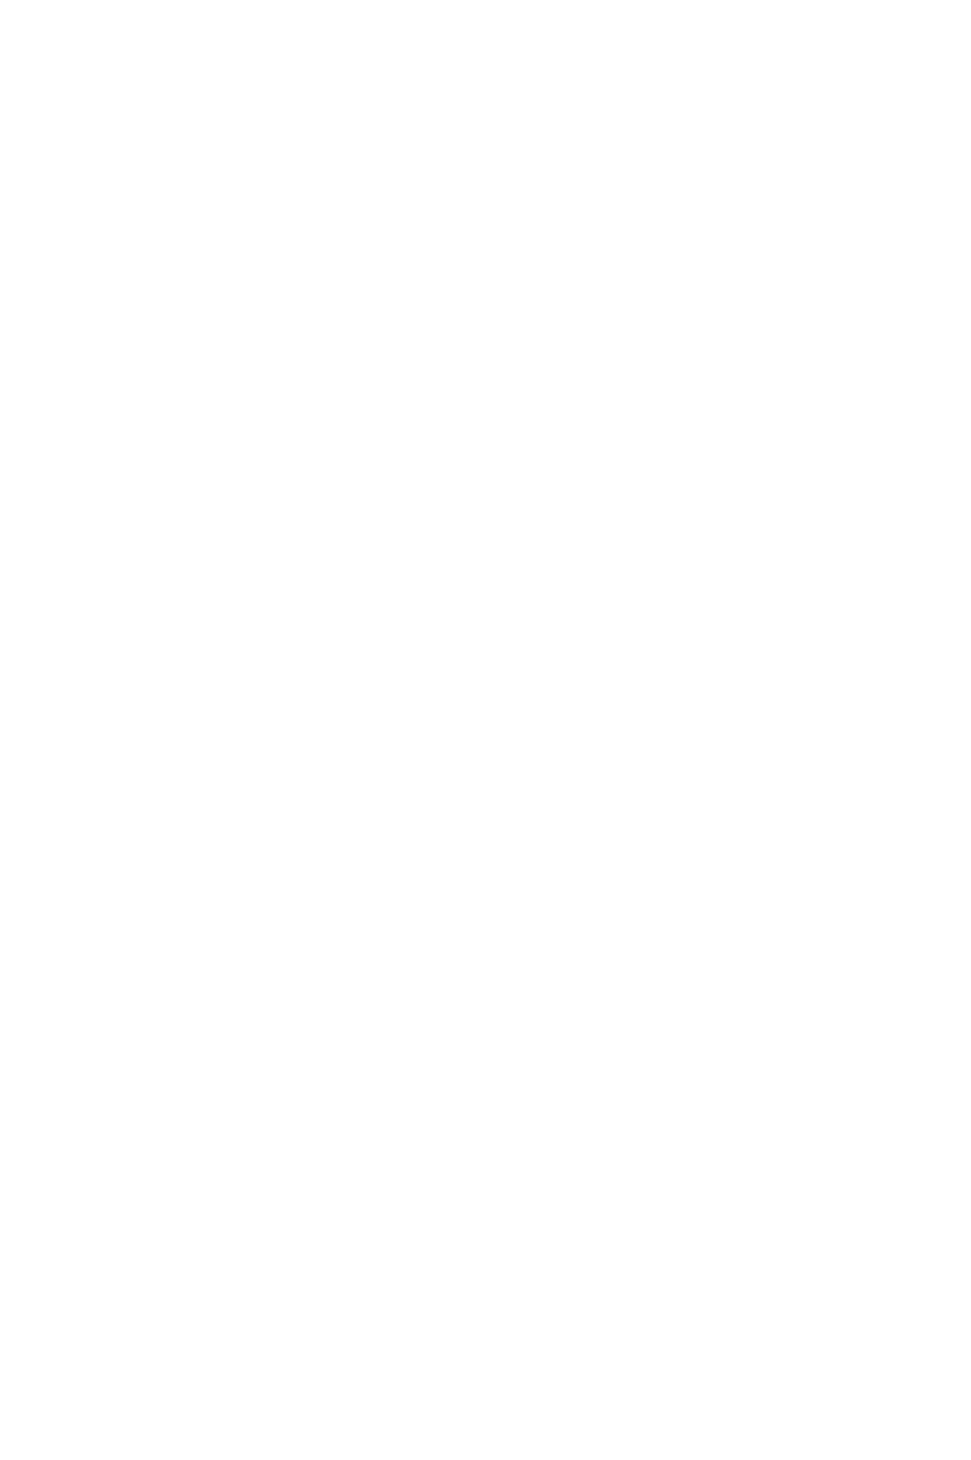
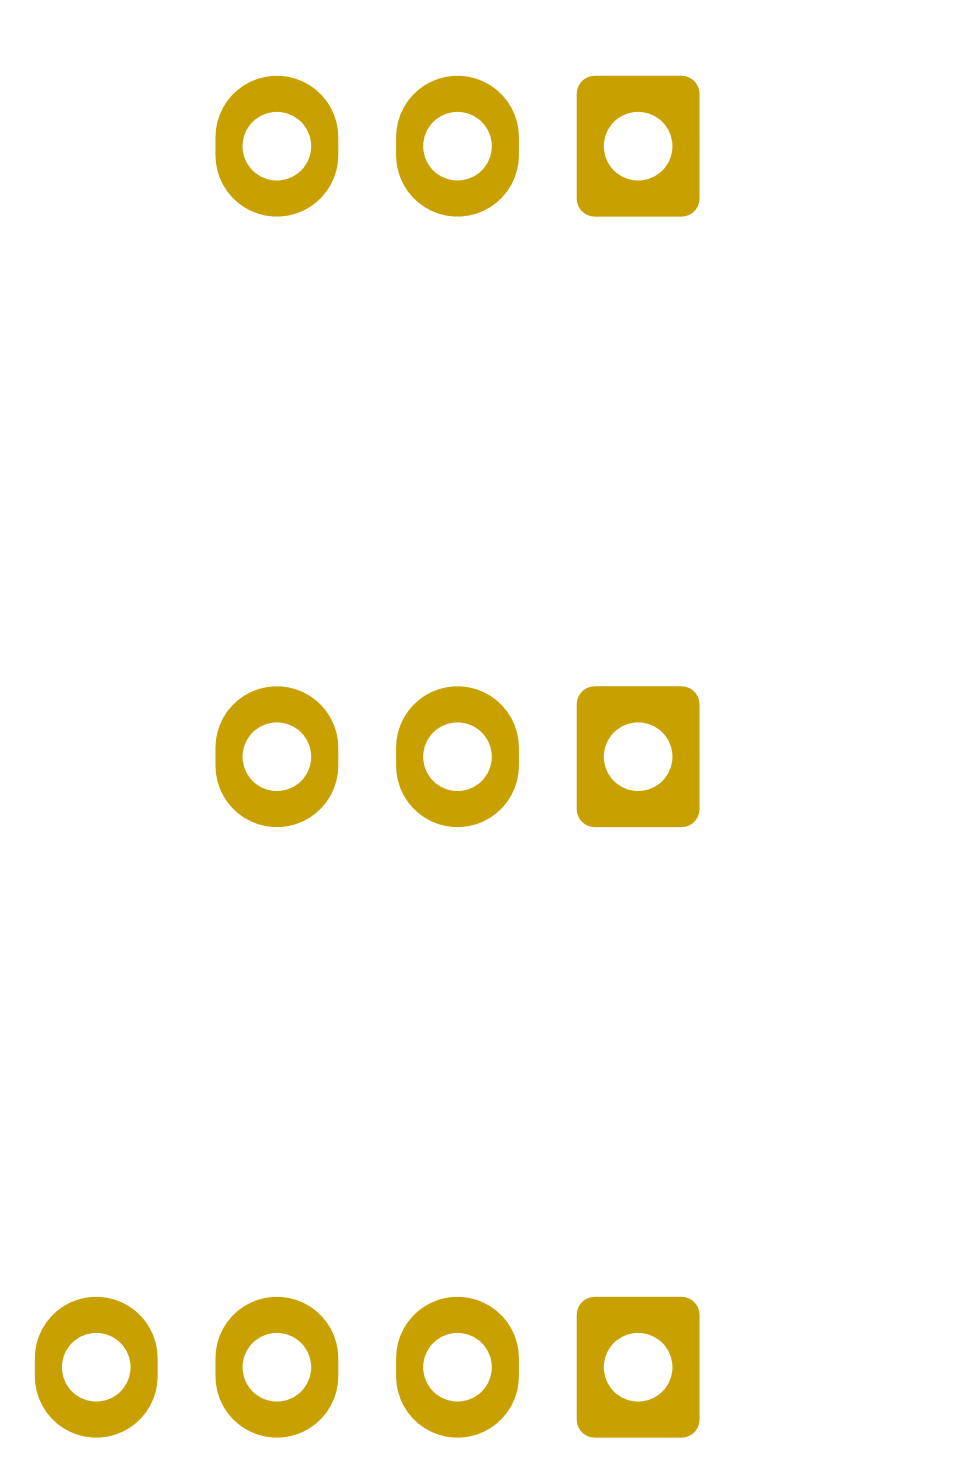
part: none -> (457, 146)
part: none -> (457, 756)
part: none -> (367, 1367)

